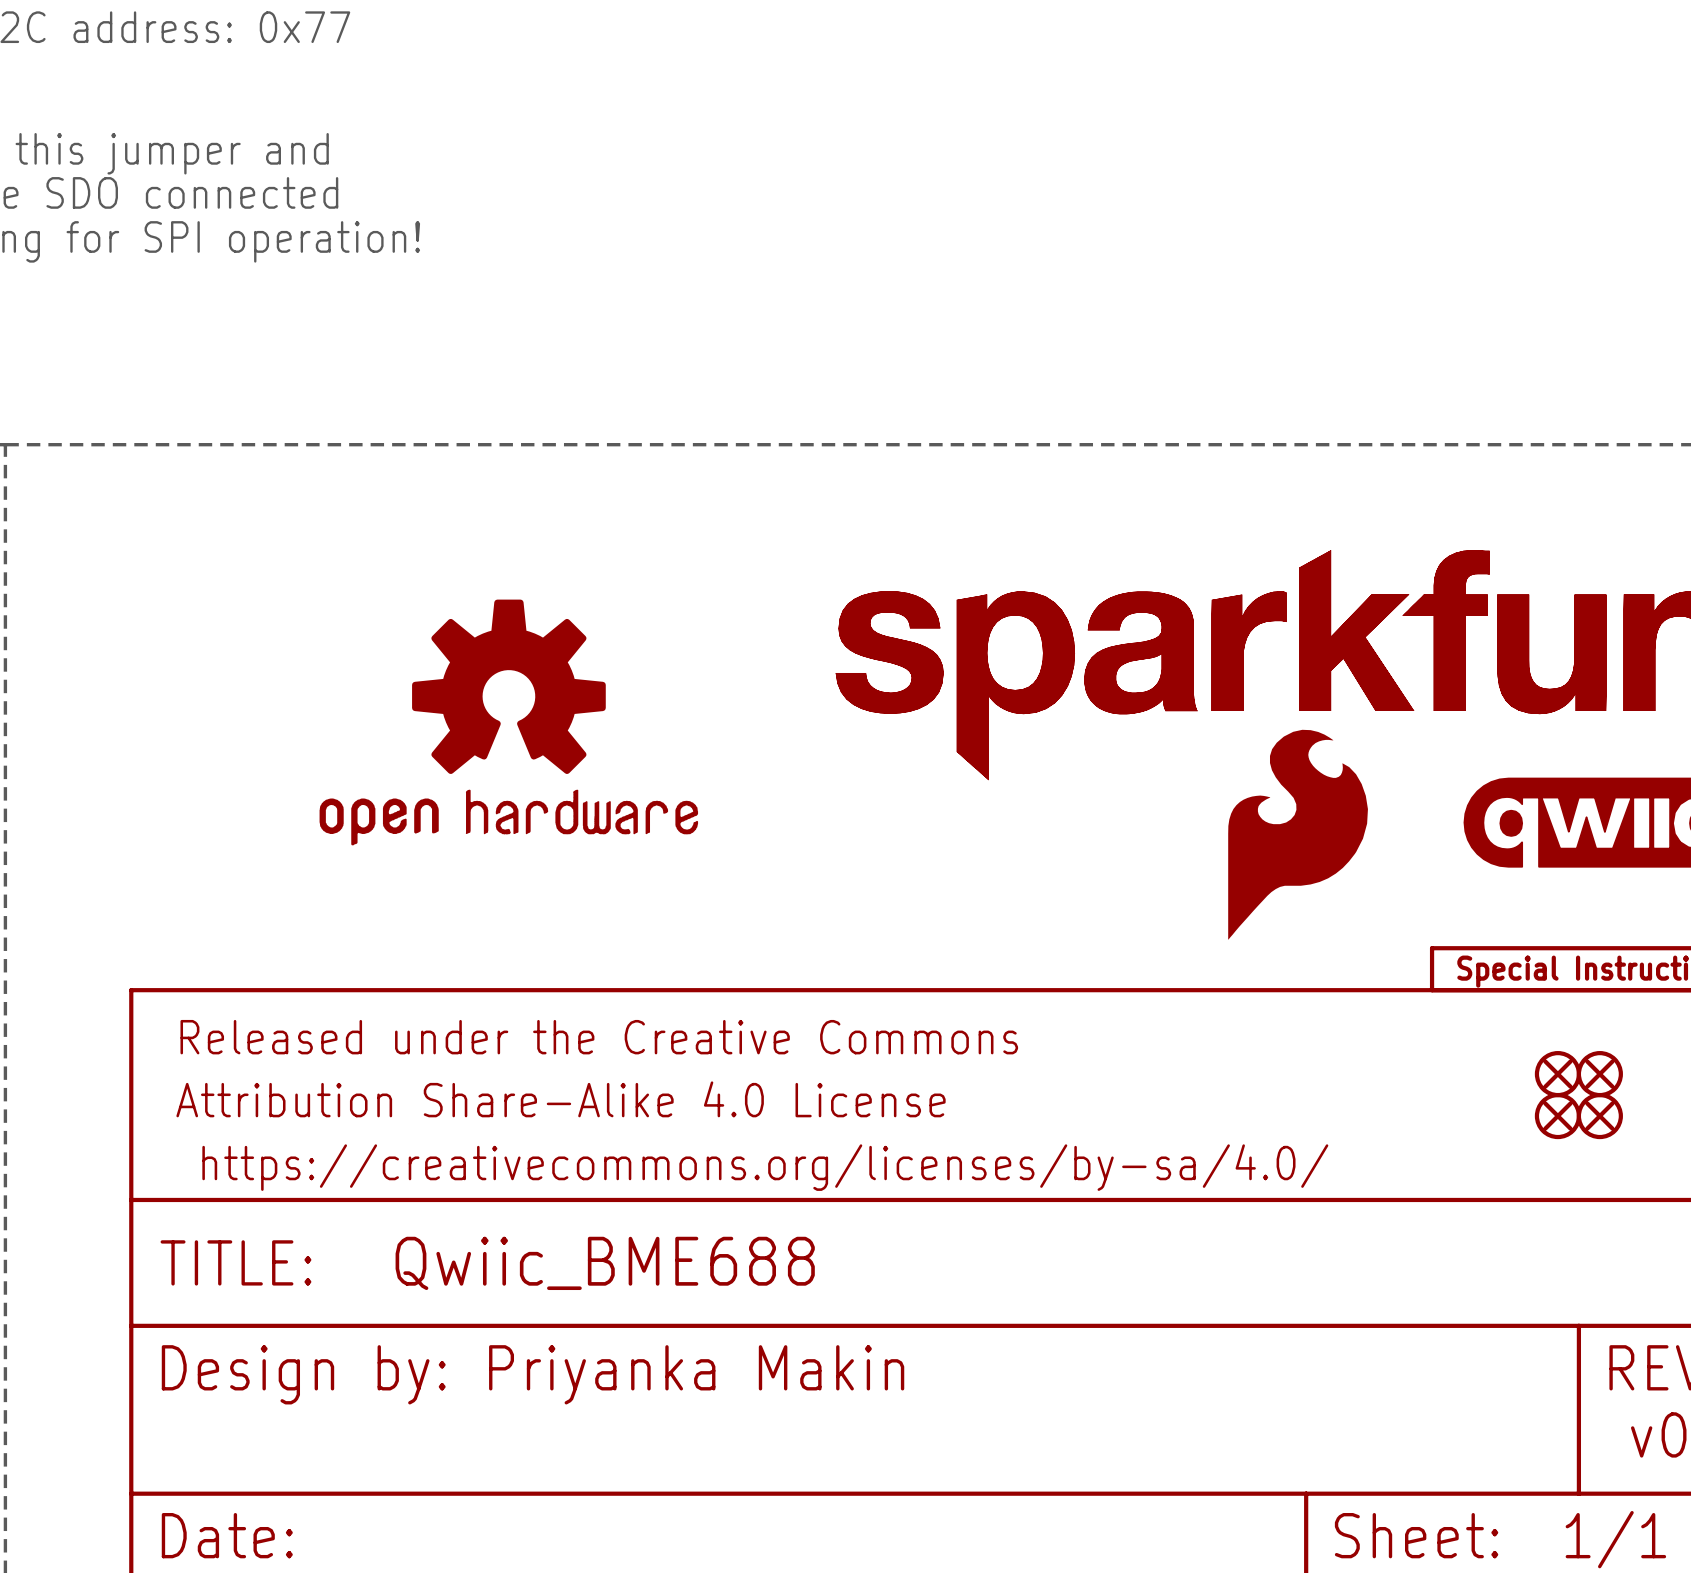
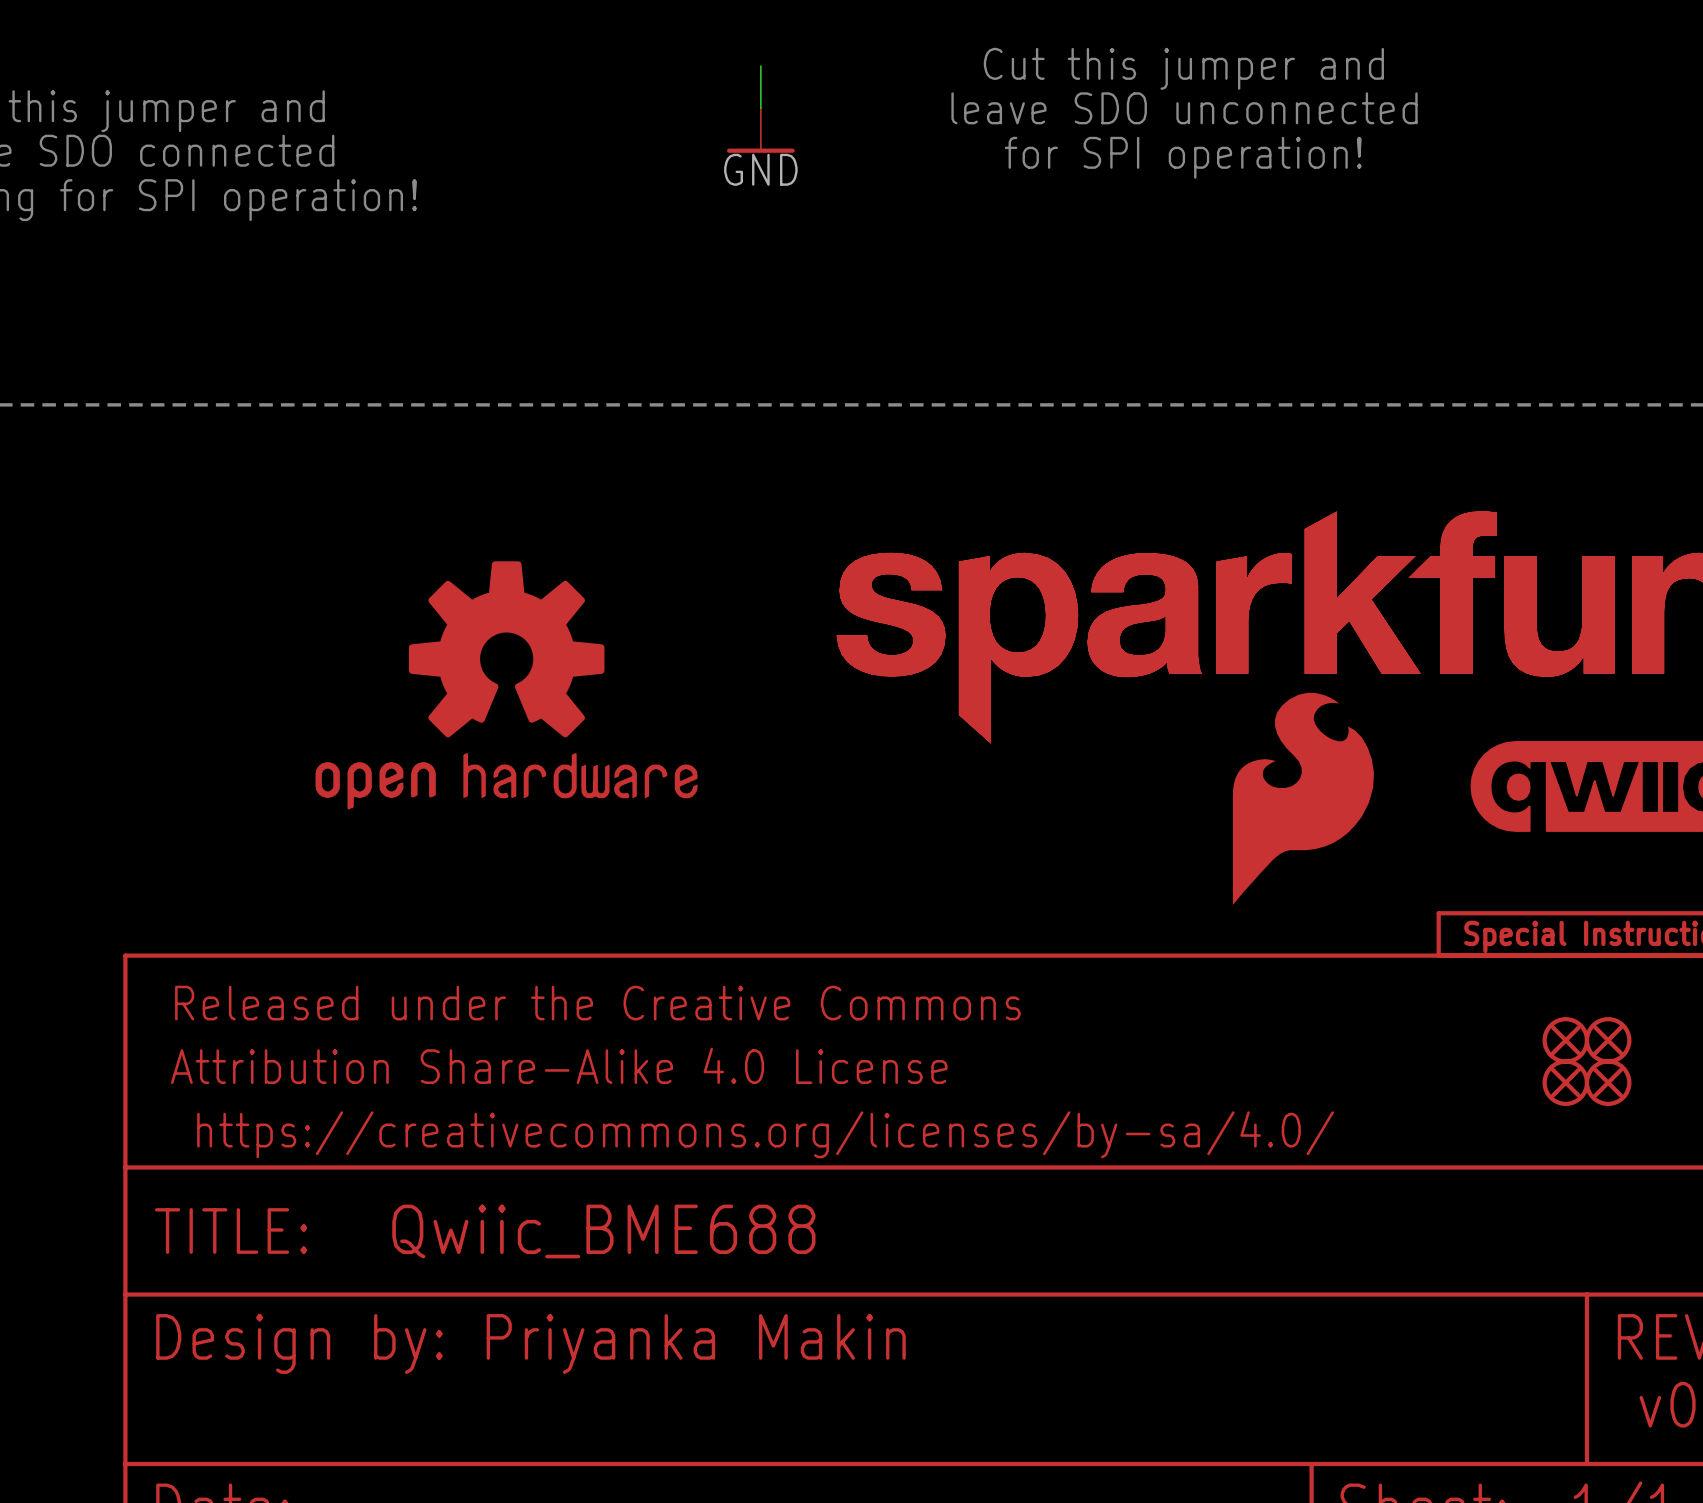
wire: none -> (760, 65) (760, 108)
text: none -> Cut this jumper and (1183, 68)
text: none -> leave SDO unconnected (1184, 108)
power symbol: none -> GND (760, 130)
text: none -> for SPI operation! (1183, 157)

